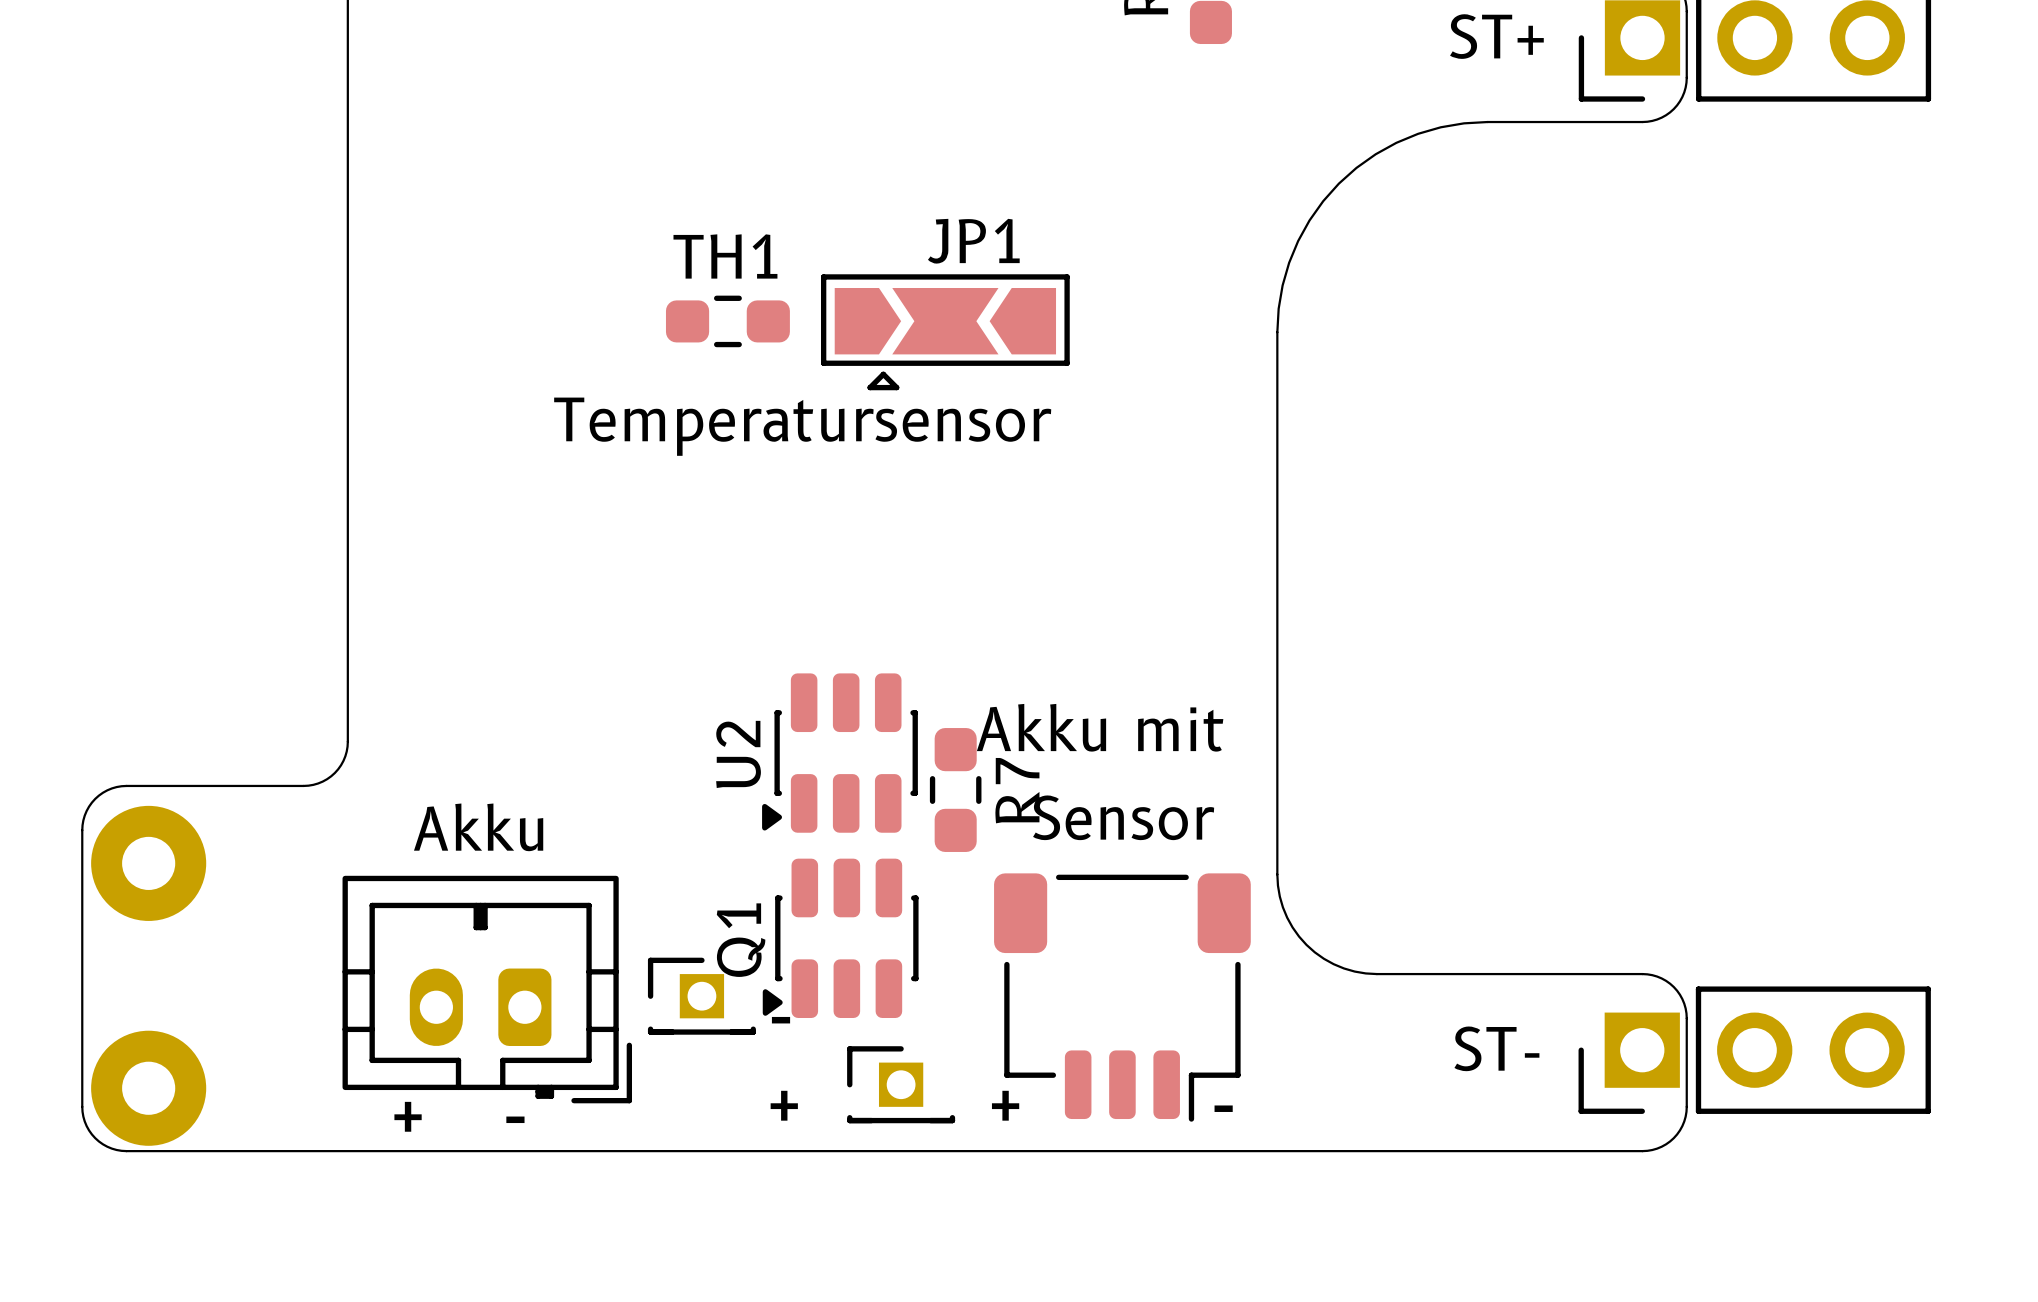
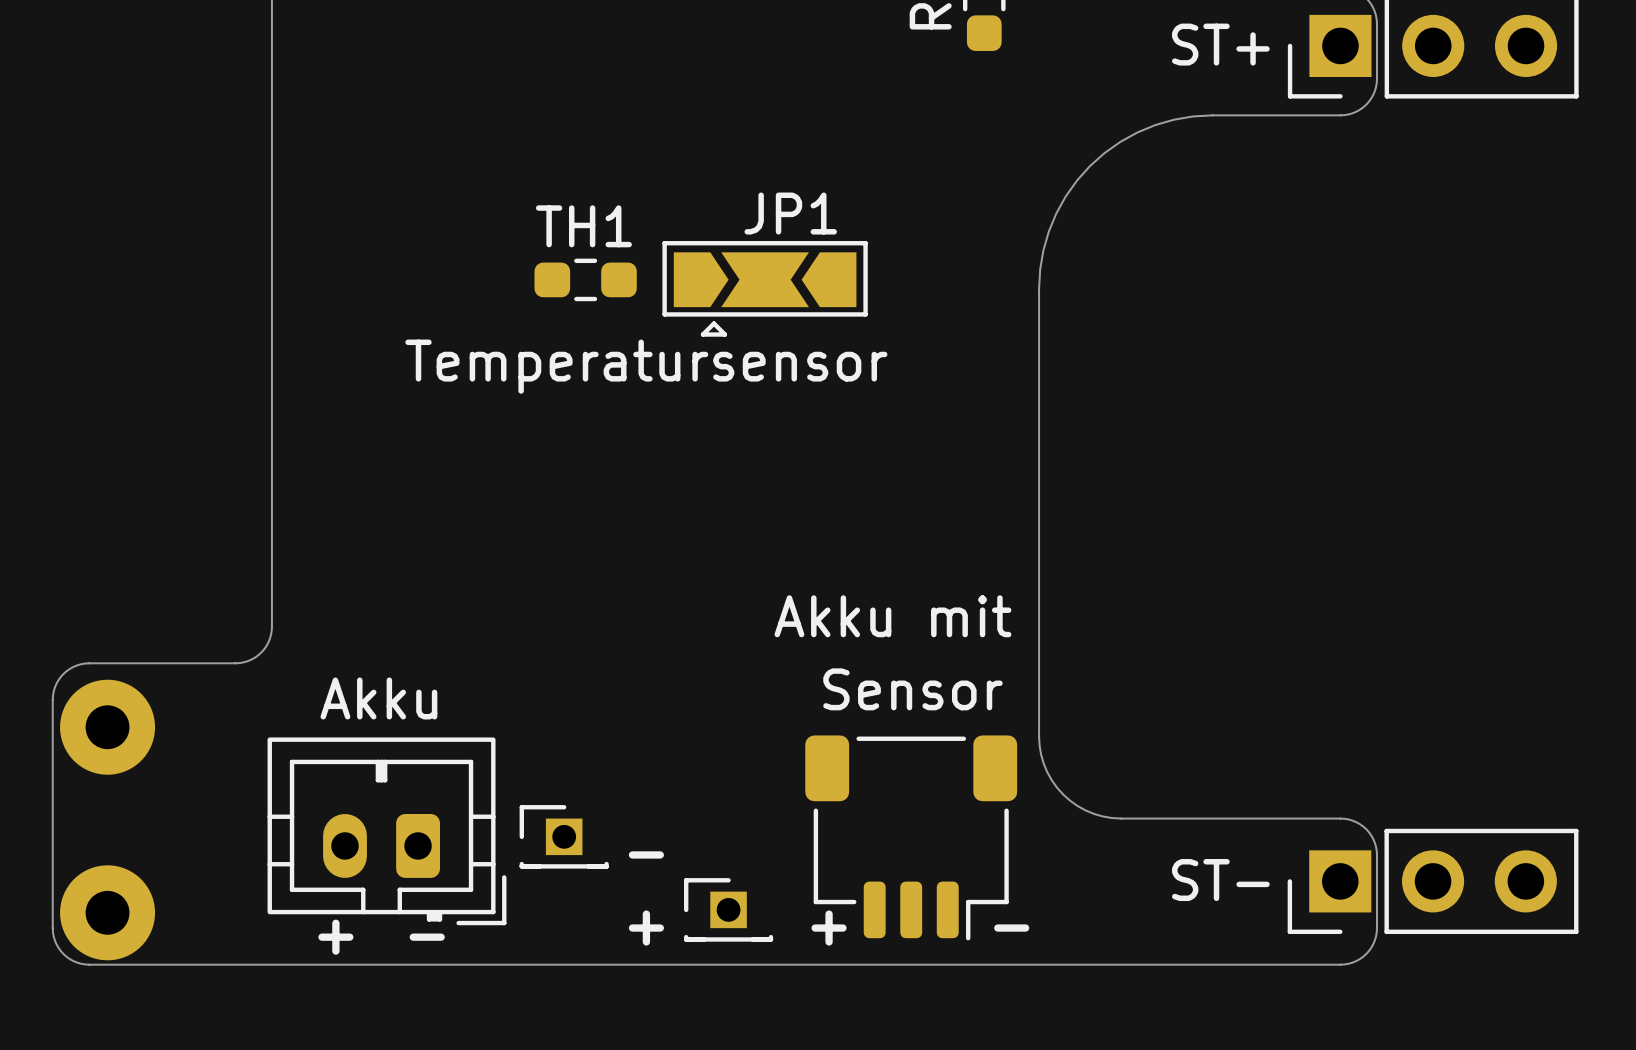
U2: (839, 753) -> none
R7: (955, 790) -> none
Q1: (840, 938) -> none

